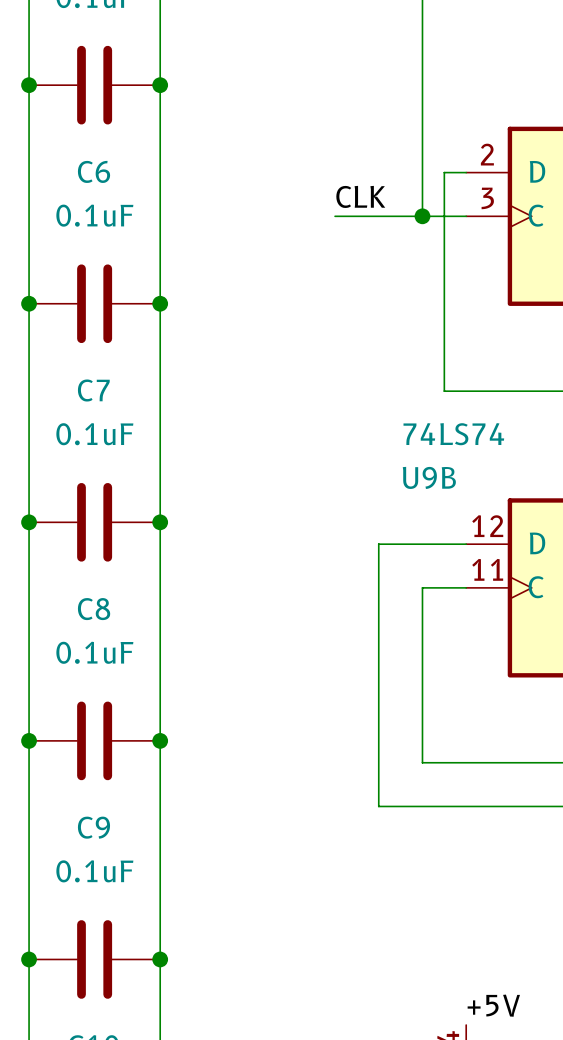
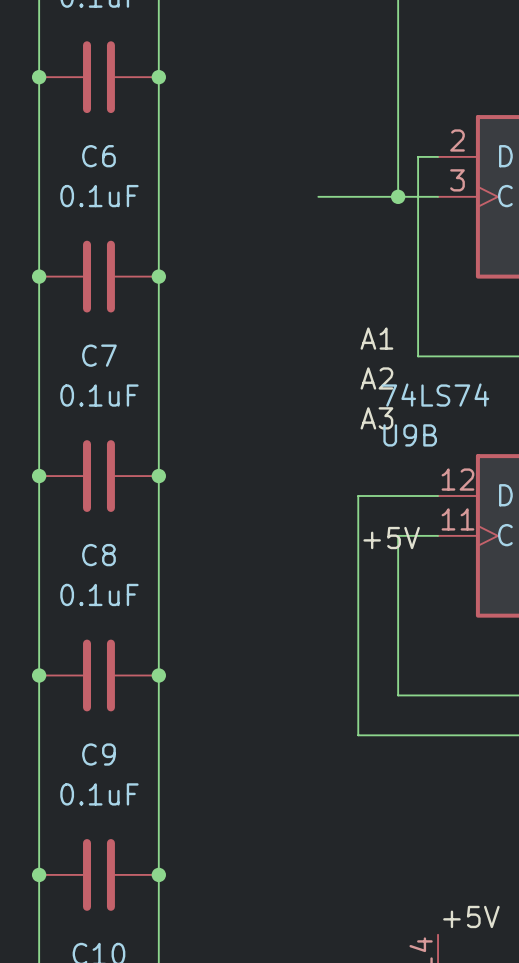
label: CLK (360, 196) -> none
label: none -> A1 (376, 338)
label: none -> A2 (376, 378)
label: none -> A3 (376, 418)
label: none -> +5V (391, 538)

